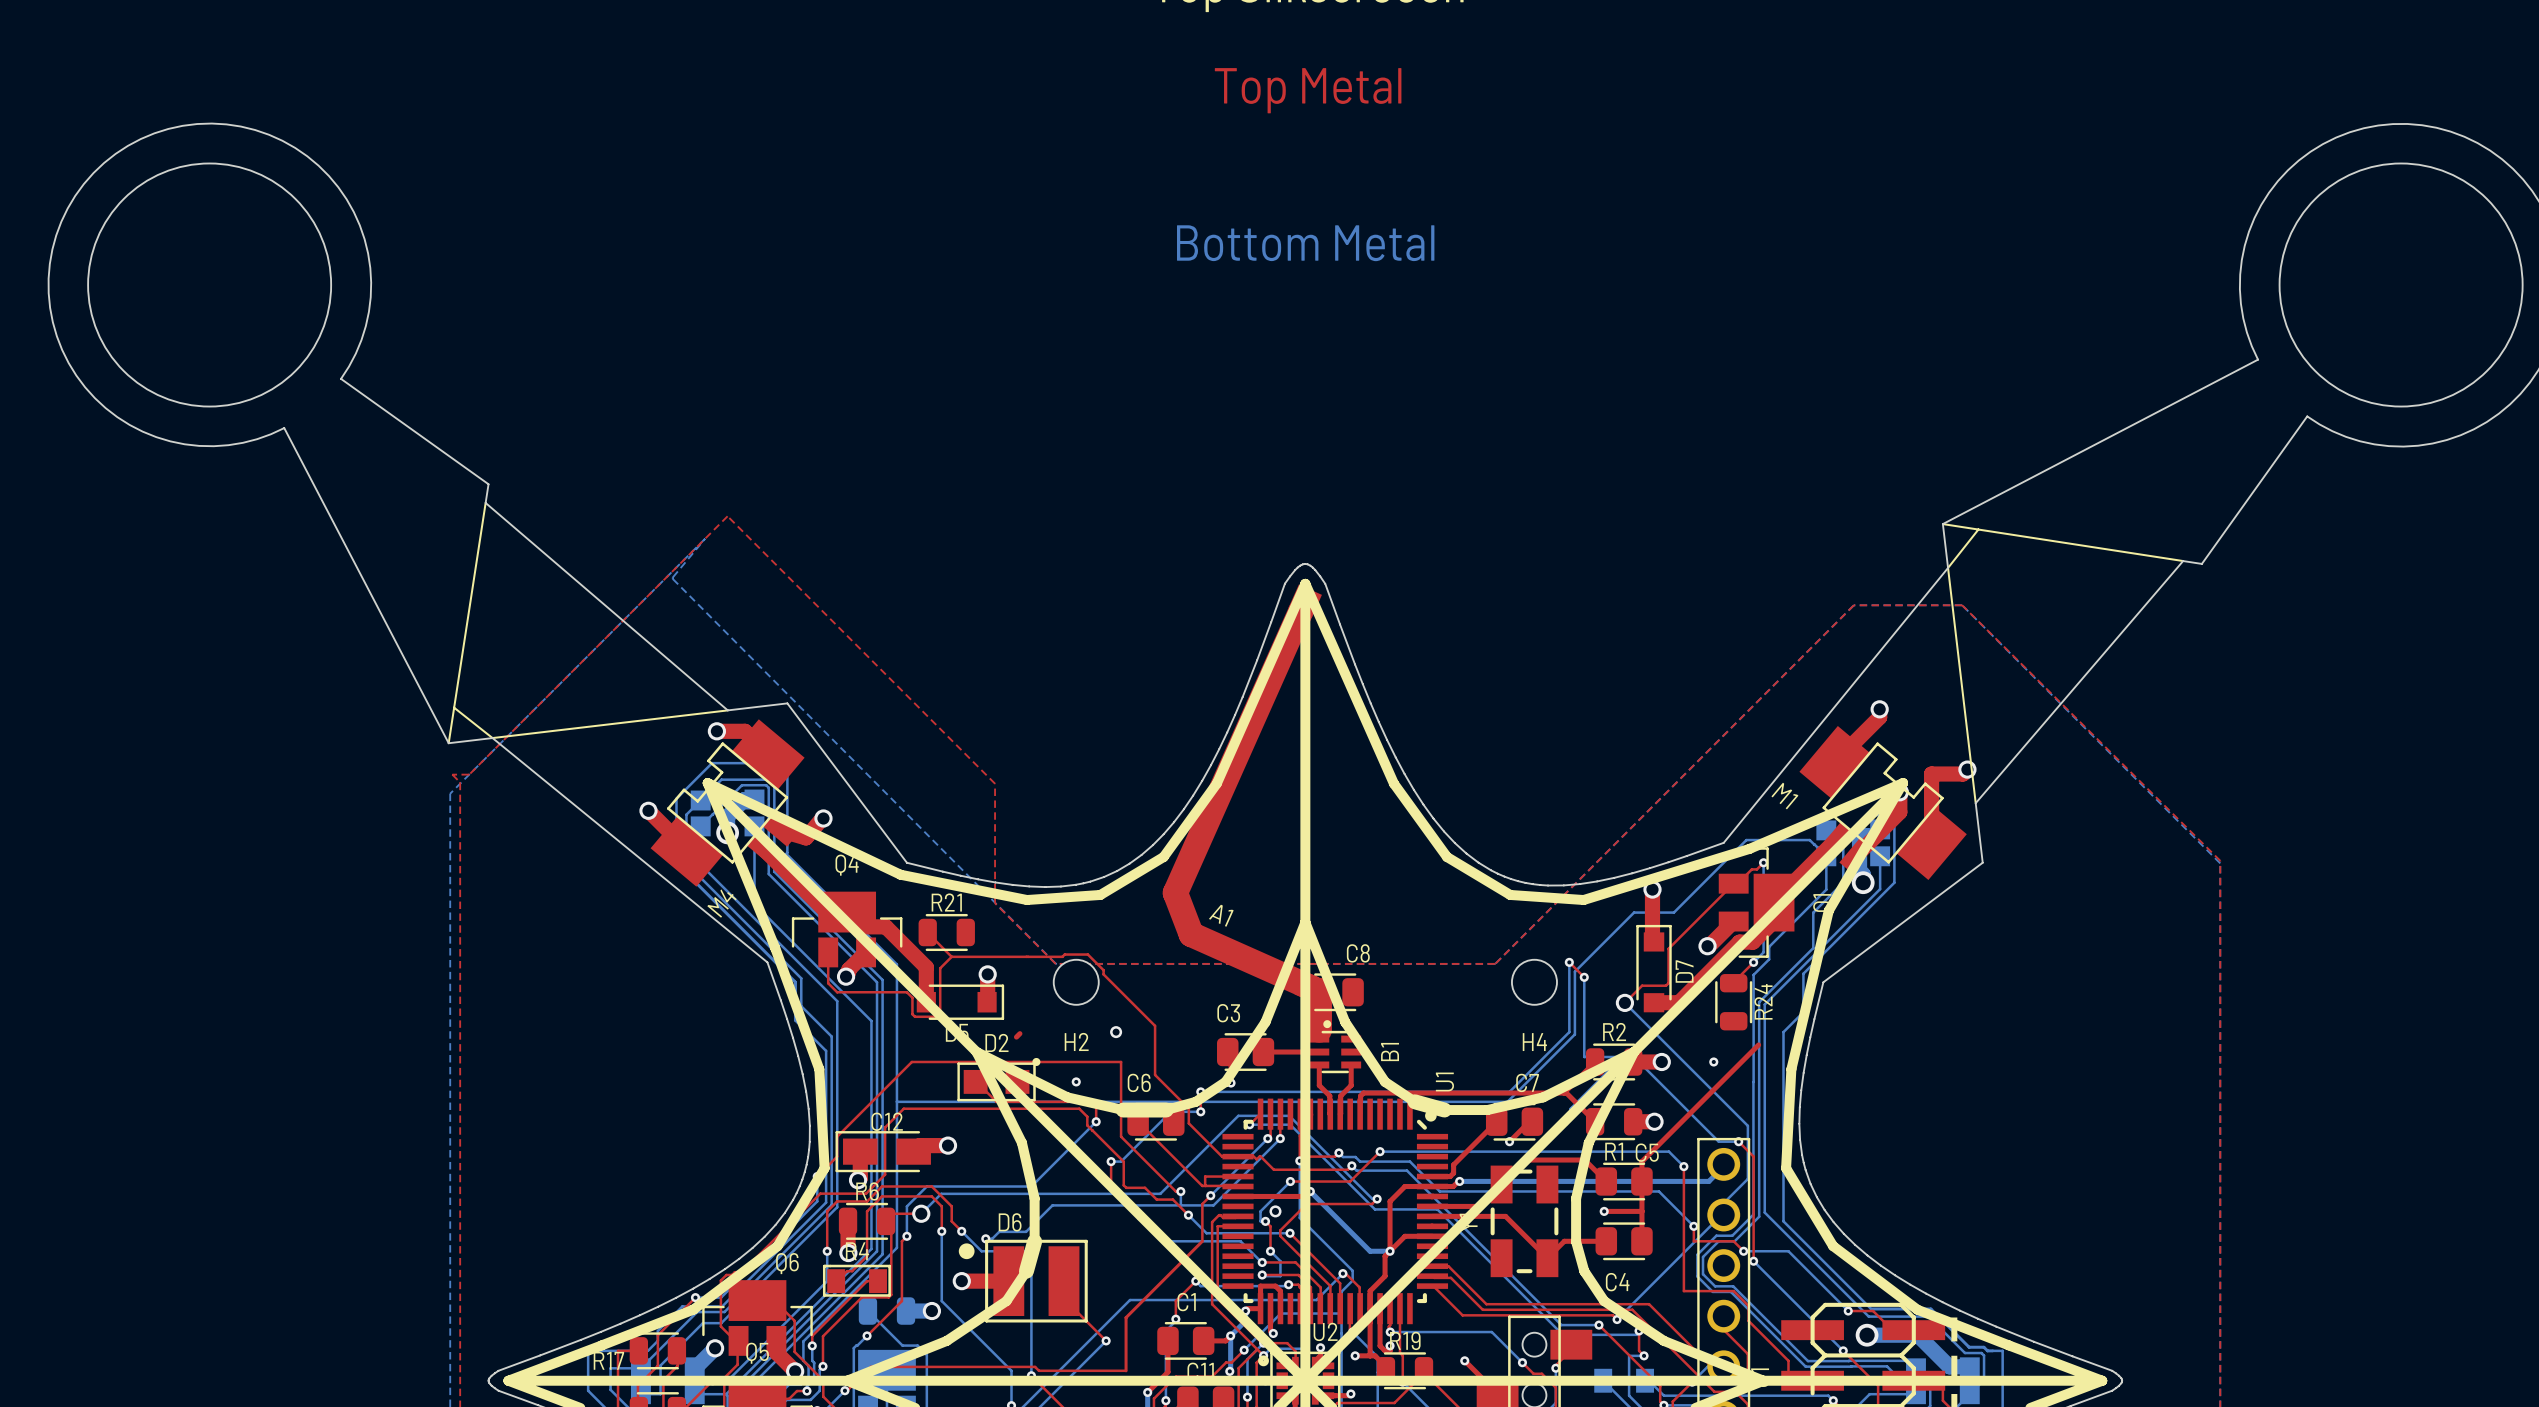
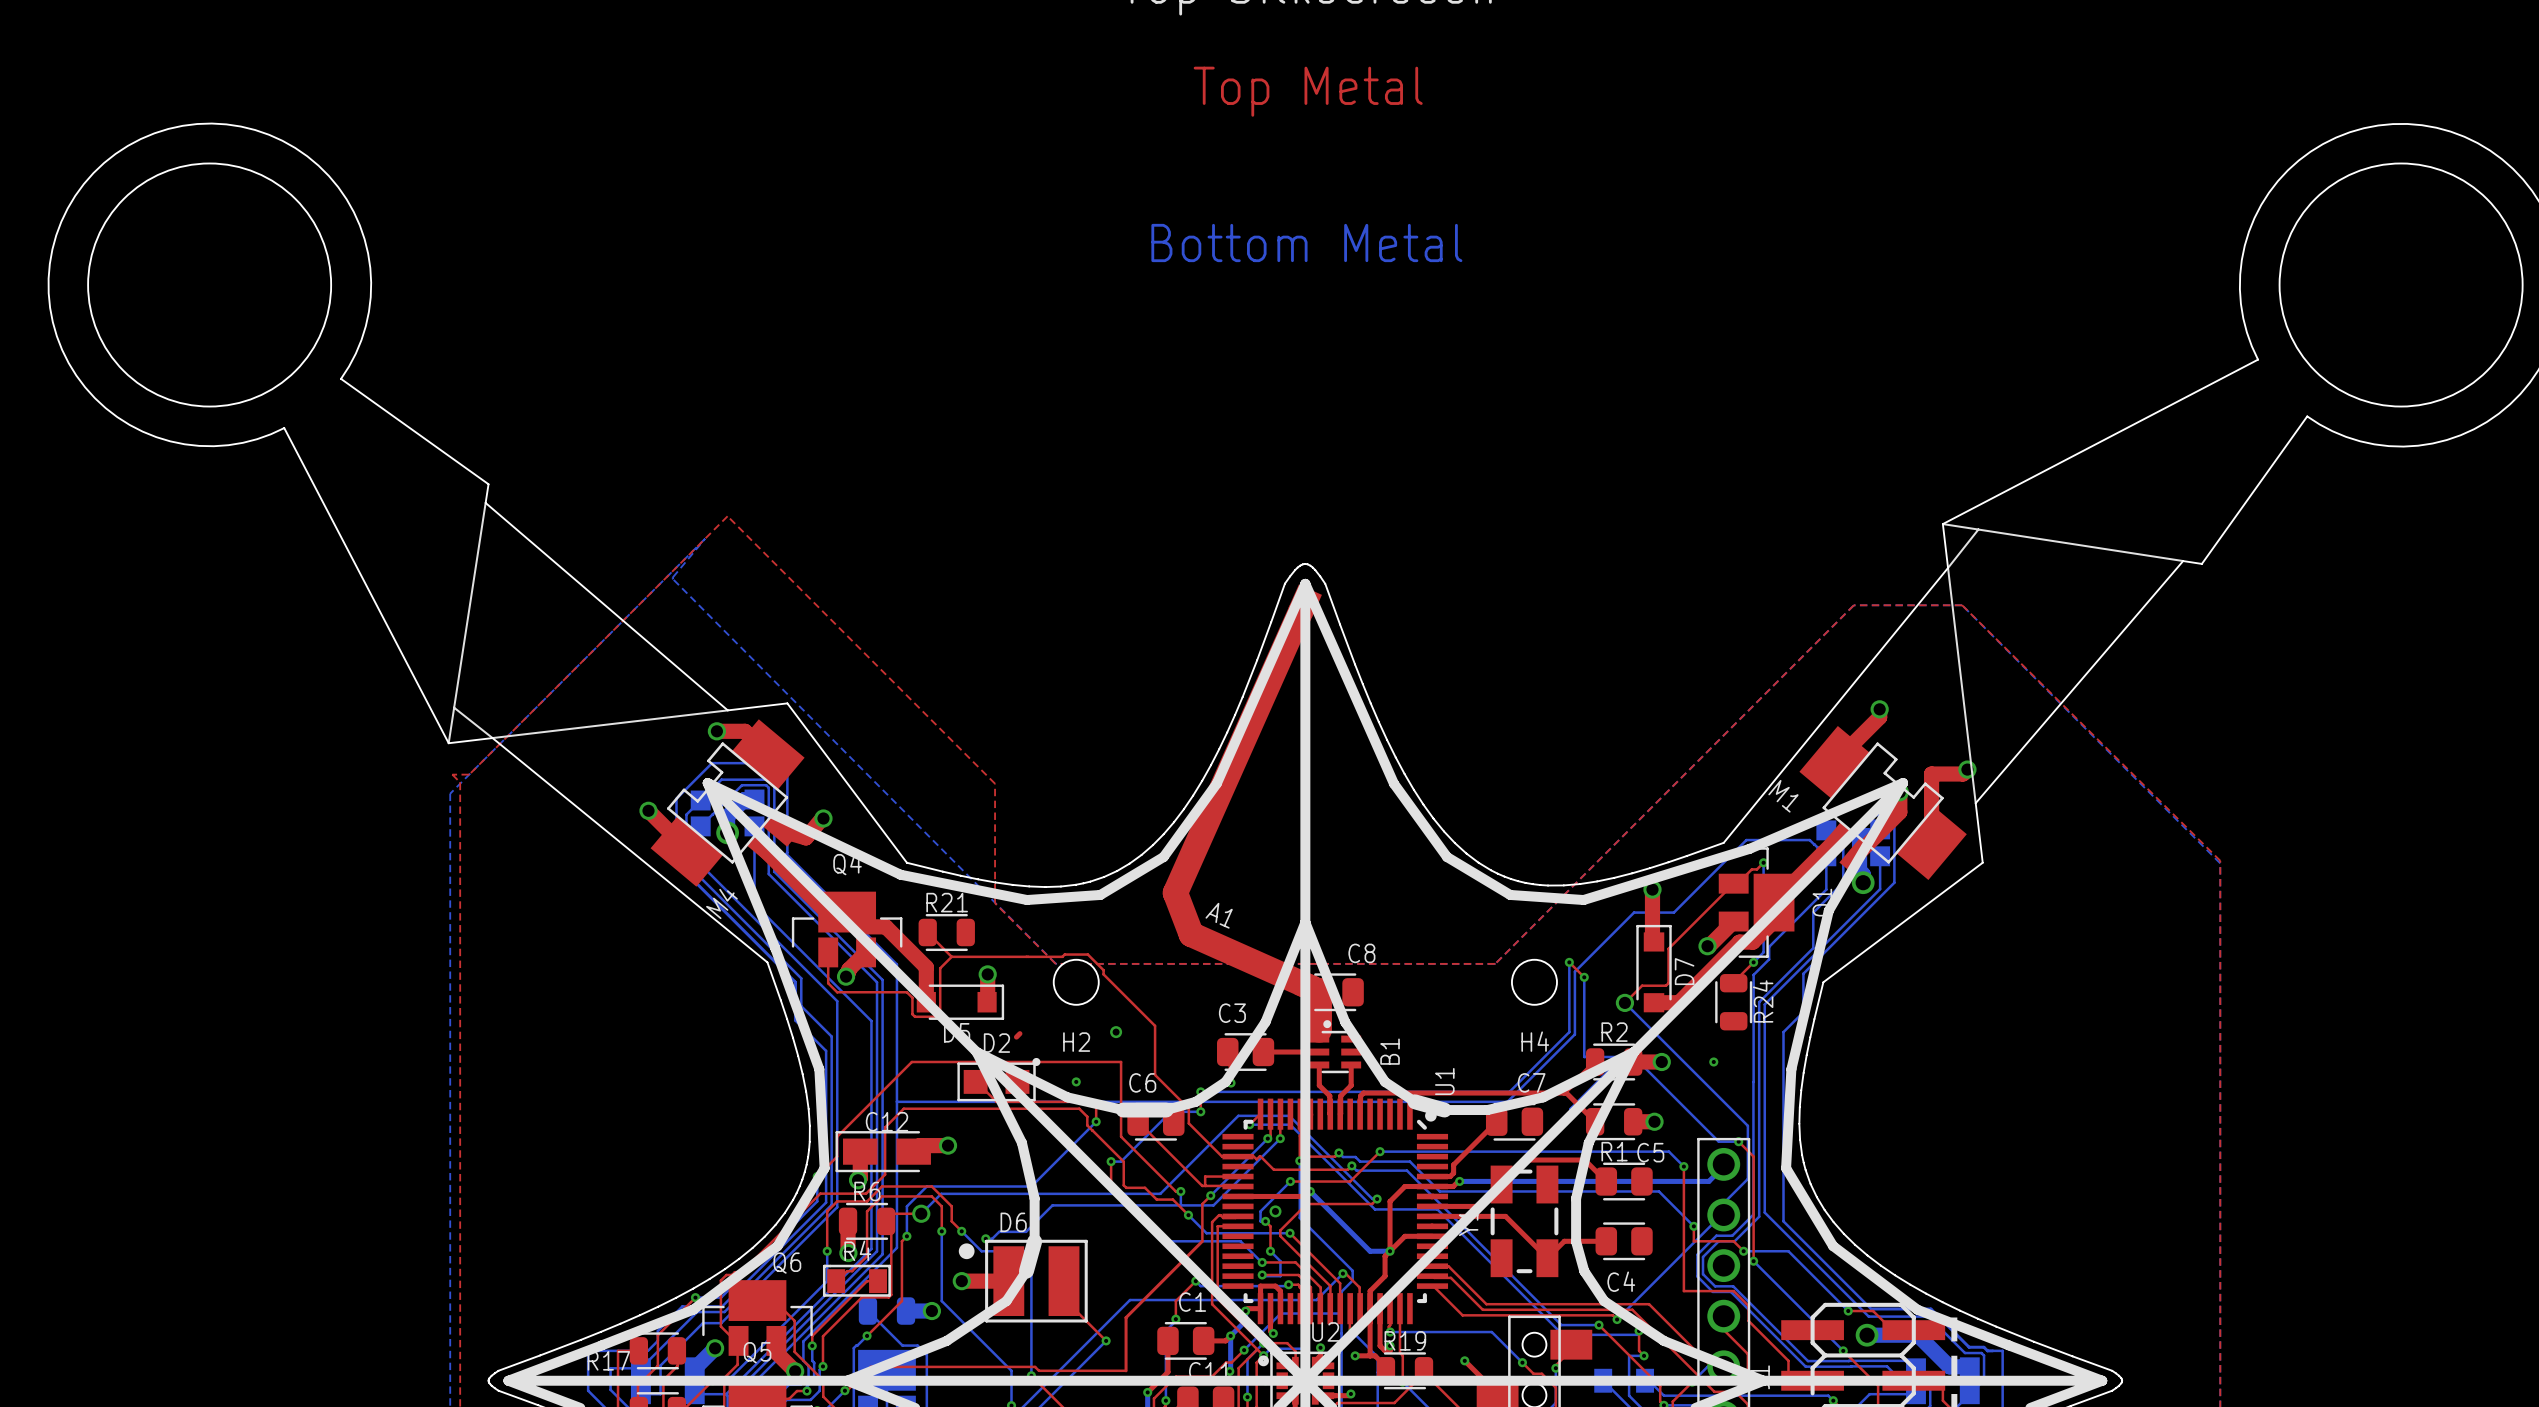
top track: (1758, 1044) (1641, 1161) (1641, 1241) -> none
top track: (1529, 1121) (1509, 1141) -> none
via: (1509, 1141) -> none
top track: (1604, 1211) (1641, 1211) -> none
via: (1604, 1211) -> none

